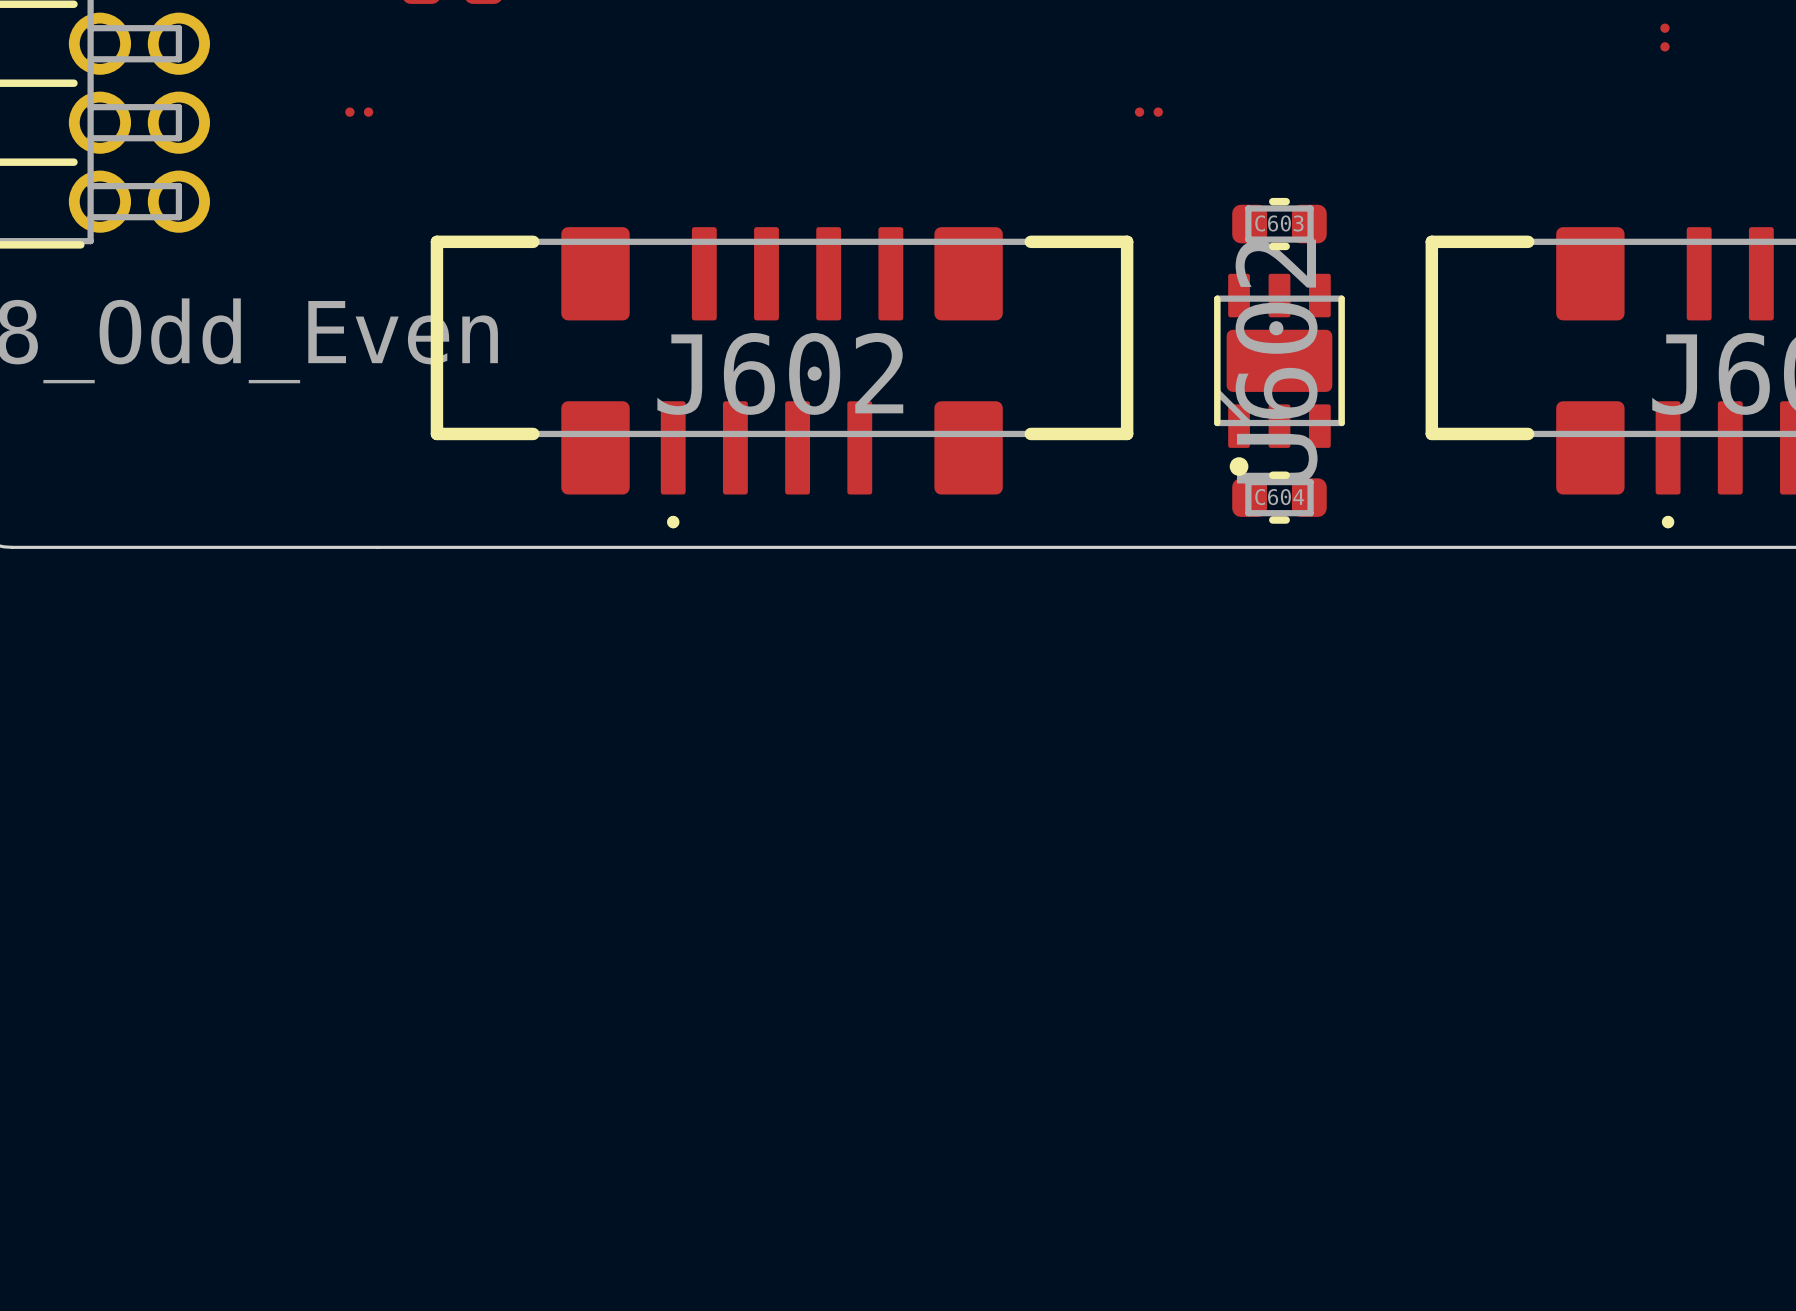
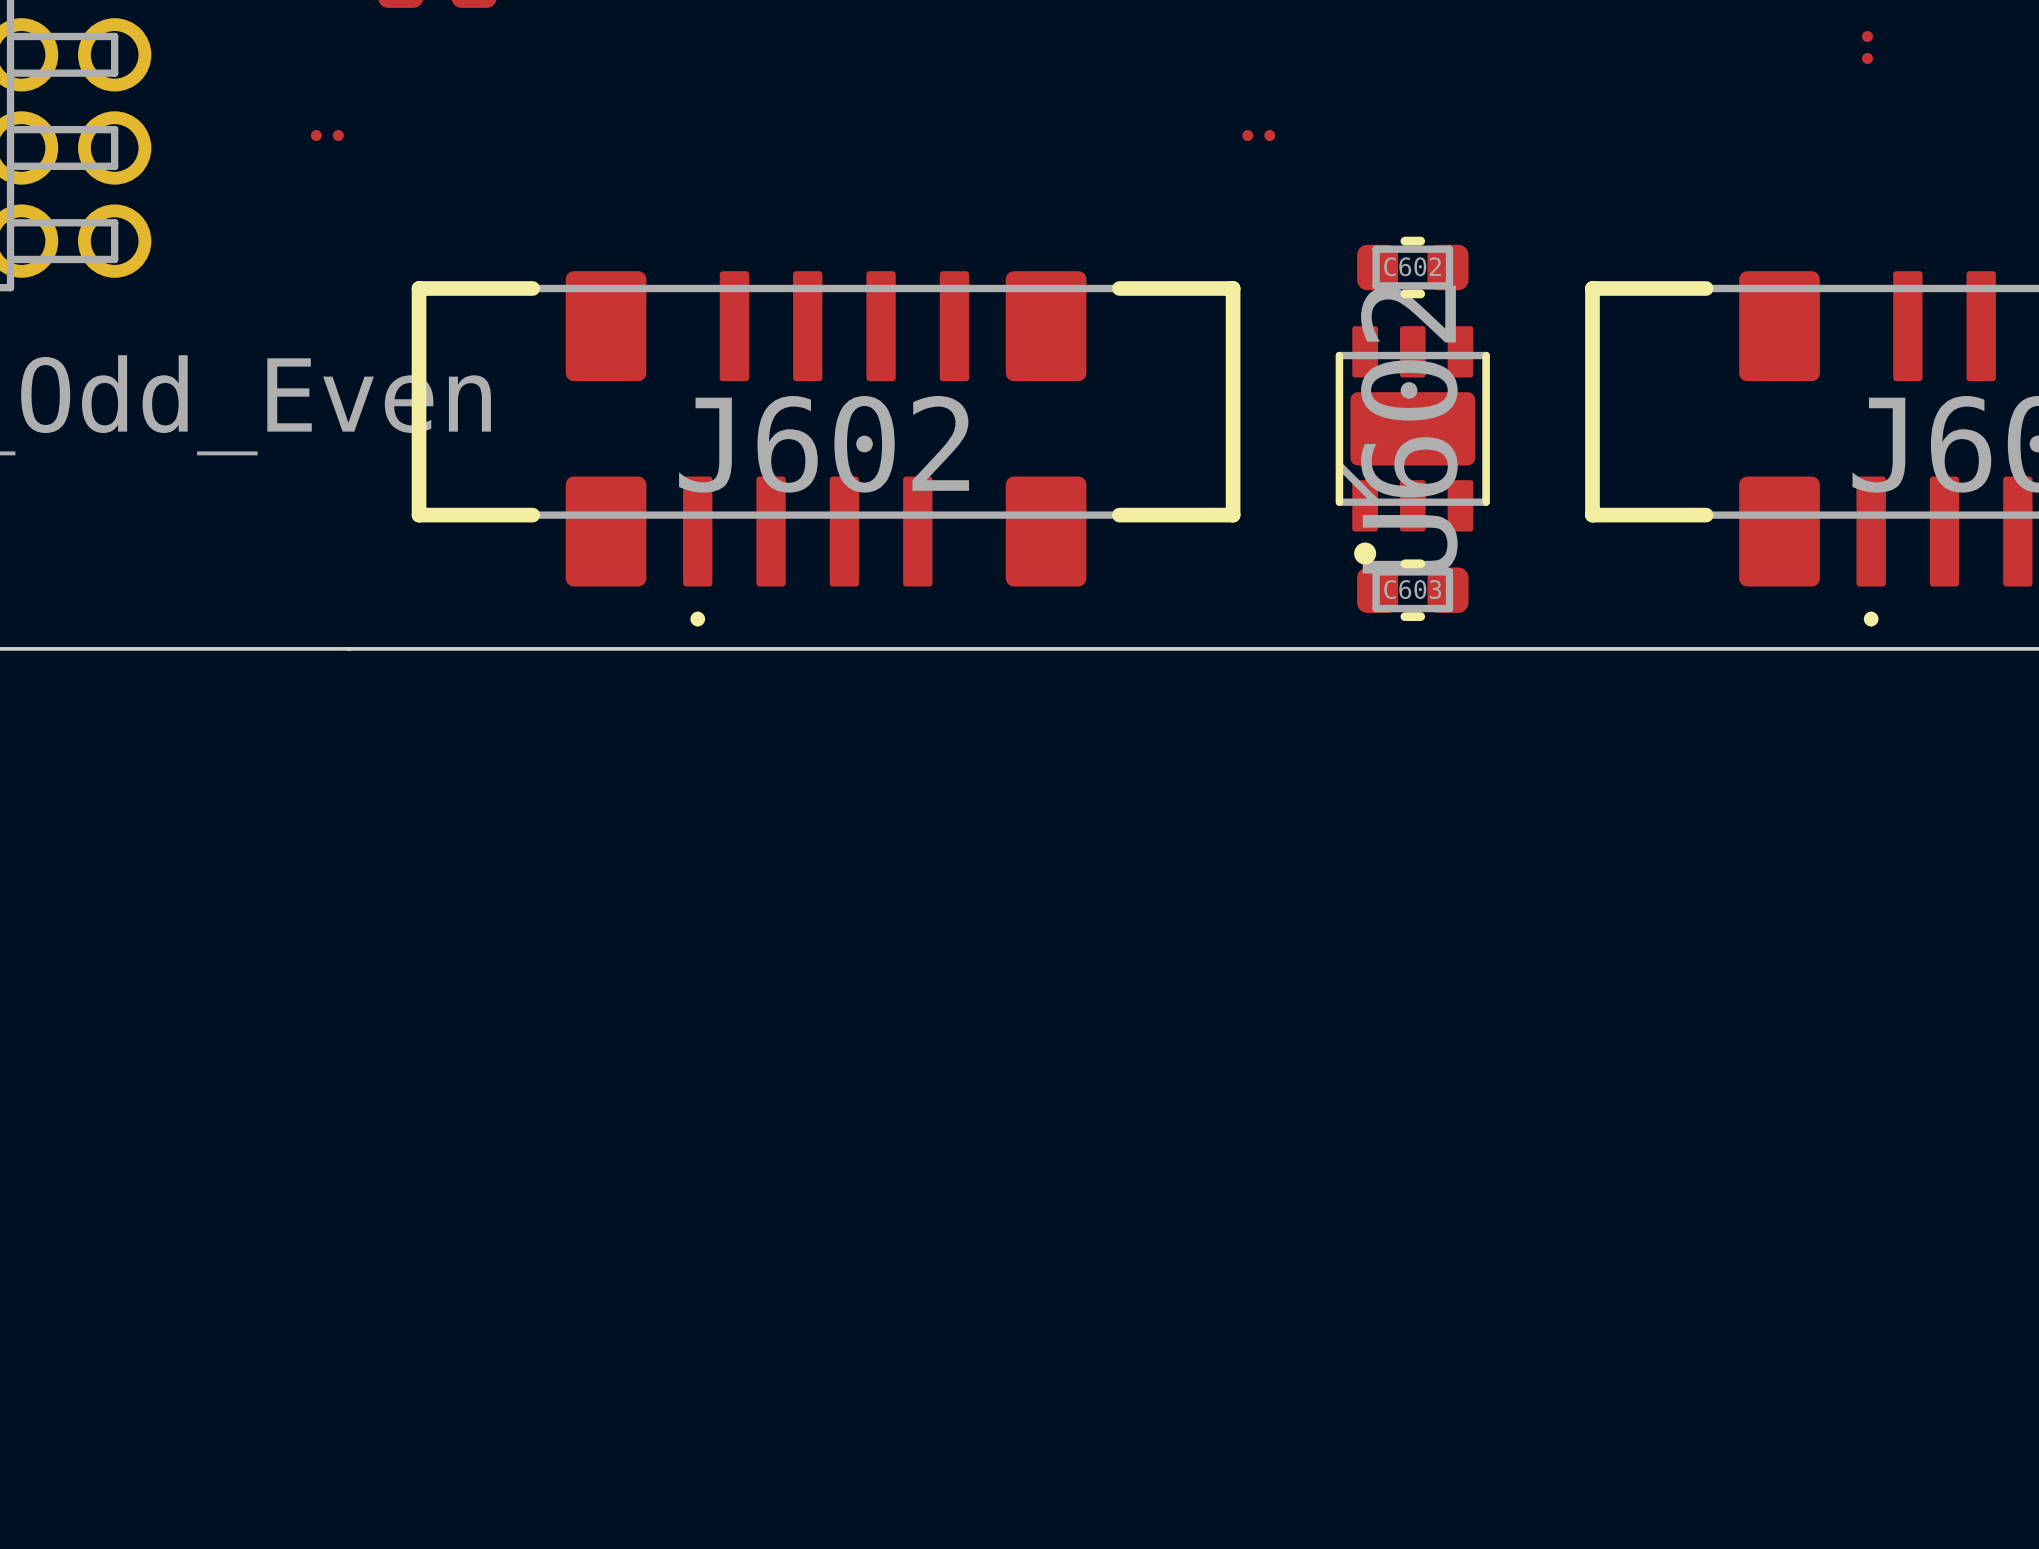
C603 name: C603 (1279, 223) -> C602 (1412, 266)
C604 name: C604 (1279, 497) -> C603 (1412, 589)

